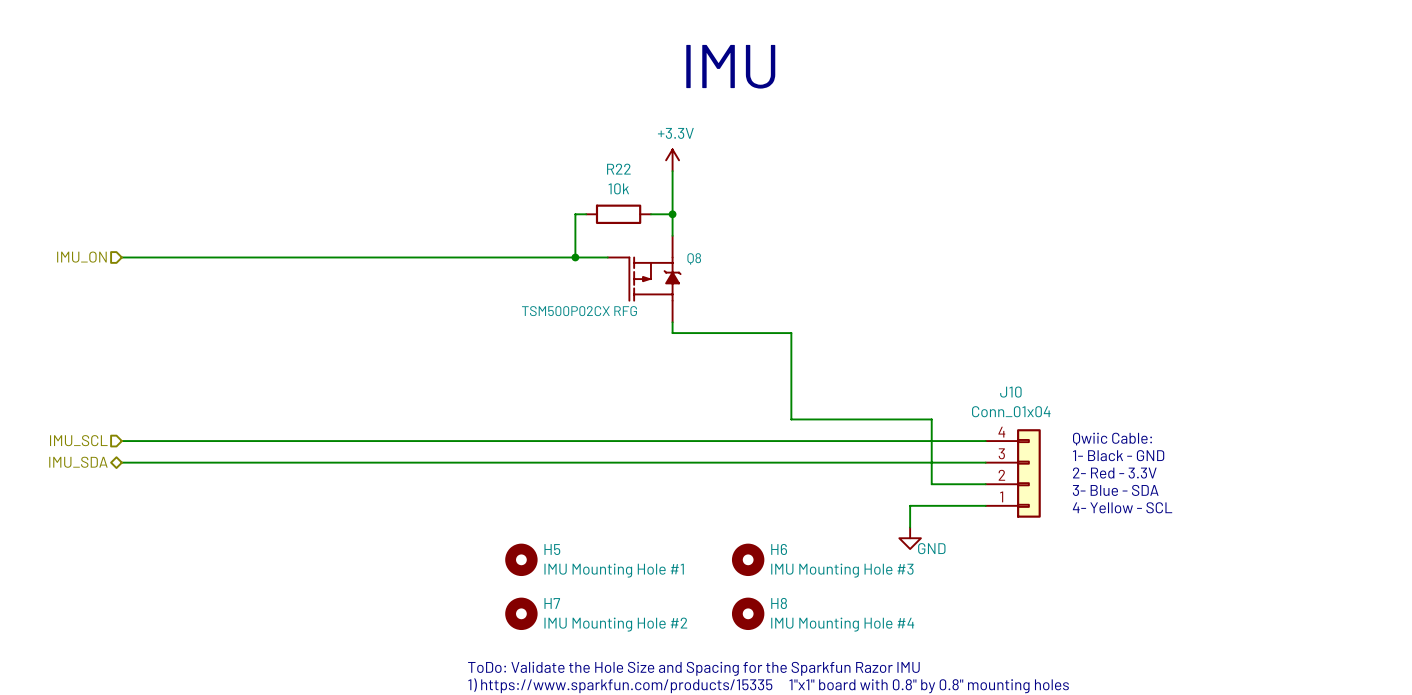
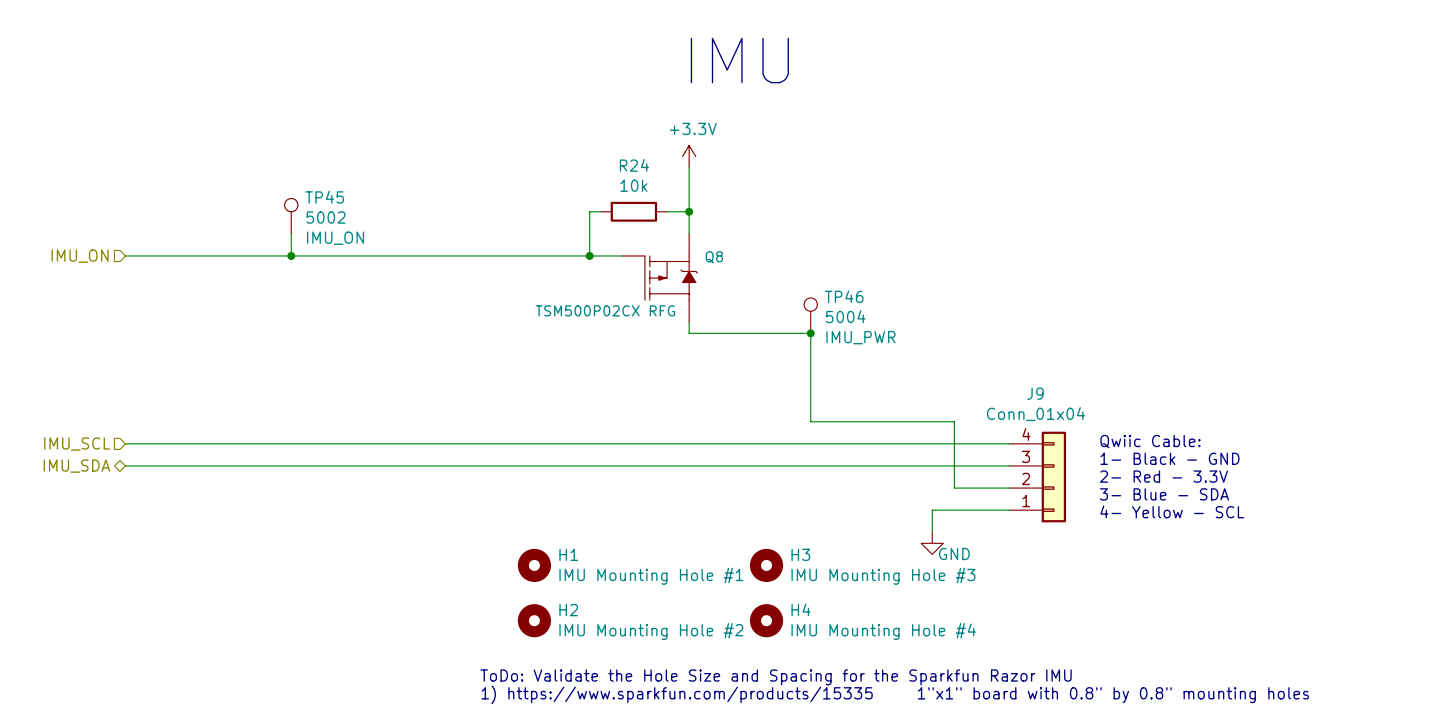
R22 name: R22 (618, 169) -> R24 (634, 165)
TP45: none -> 5002 (291, 216)
wire: none -> (291, 233) (291, 255)
junction: none -> (291, 255)
TP46: none -> 5004 (810, 315)
junction: none -> (810, 333)
J10 name: J10 (1010, 392) -> J9 (1035, 393)
H5 name: H5 (552, 549) -> H1 (568, 554)
H6 name: H6 (779, 549) -> H3 (800, 554)
H7 name: H7 (552, 603) -> H2 (568, 610)
H8 name: H8 (779, 603) -> H4 (801, 609)

